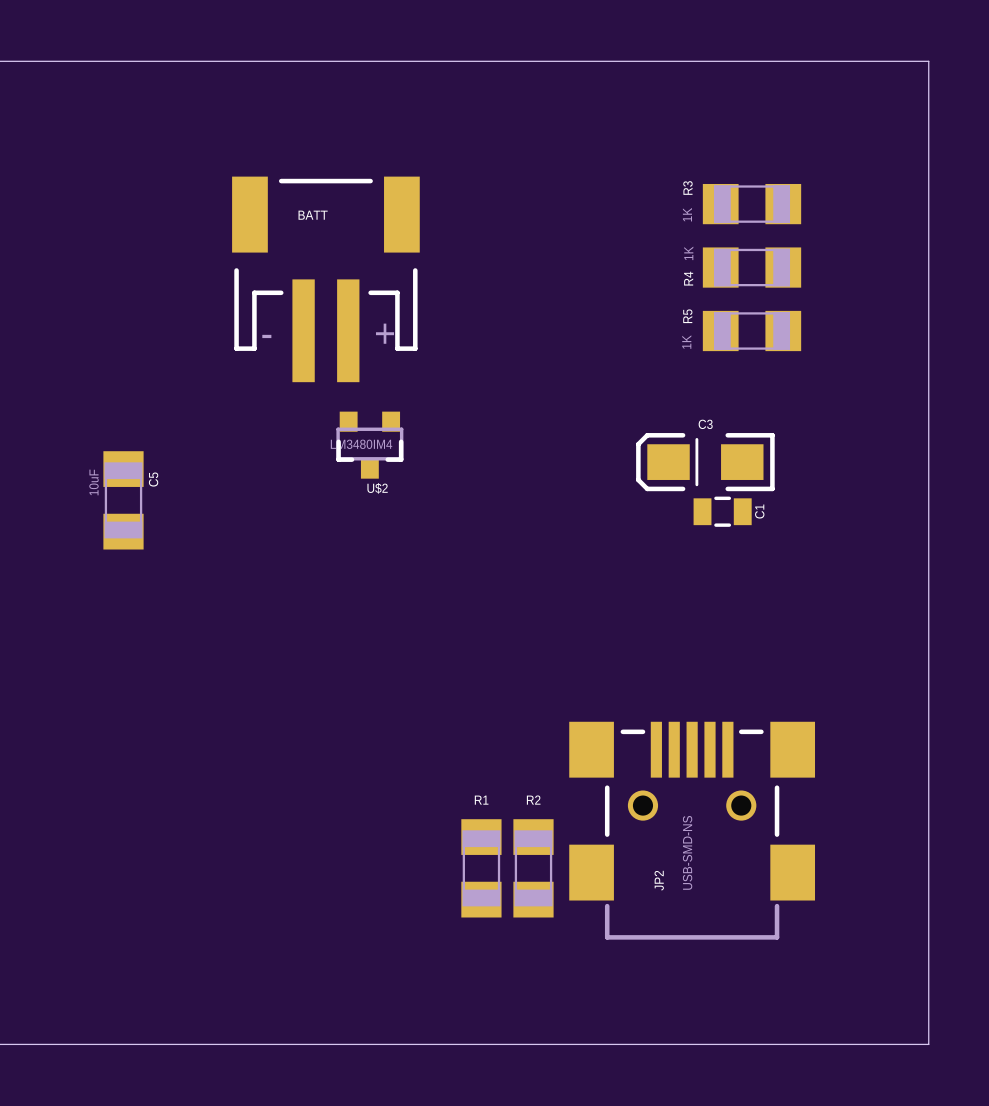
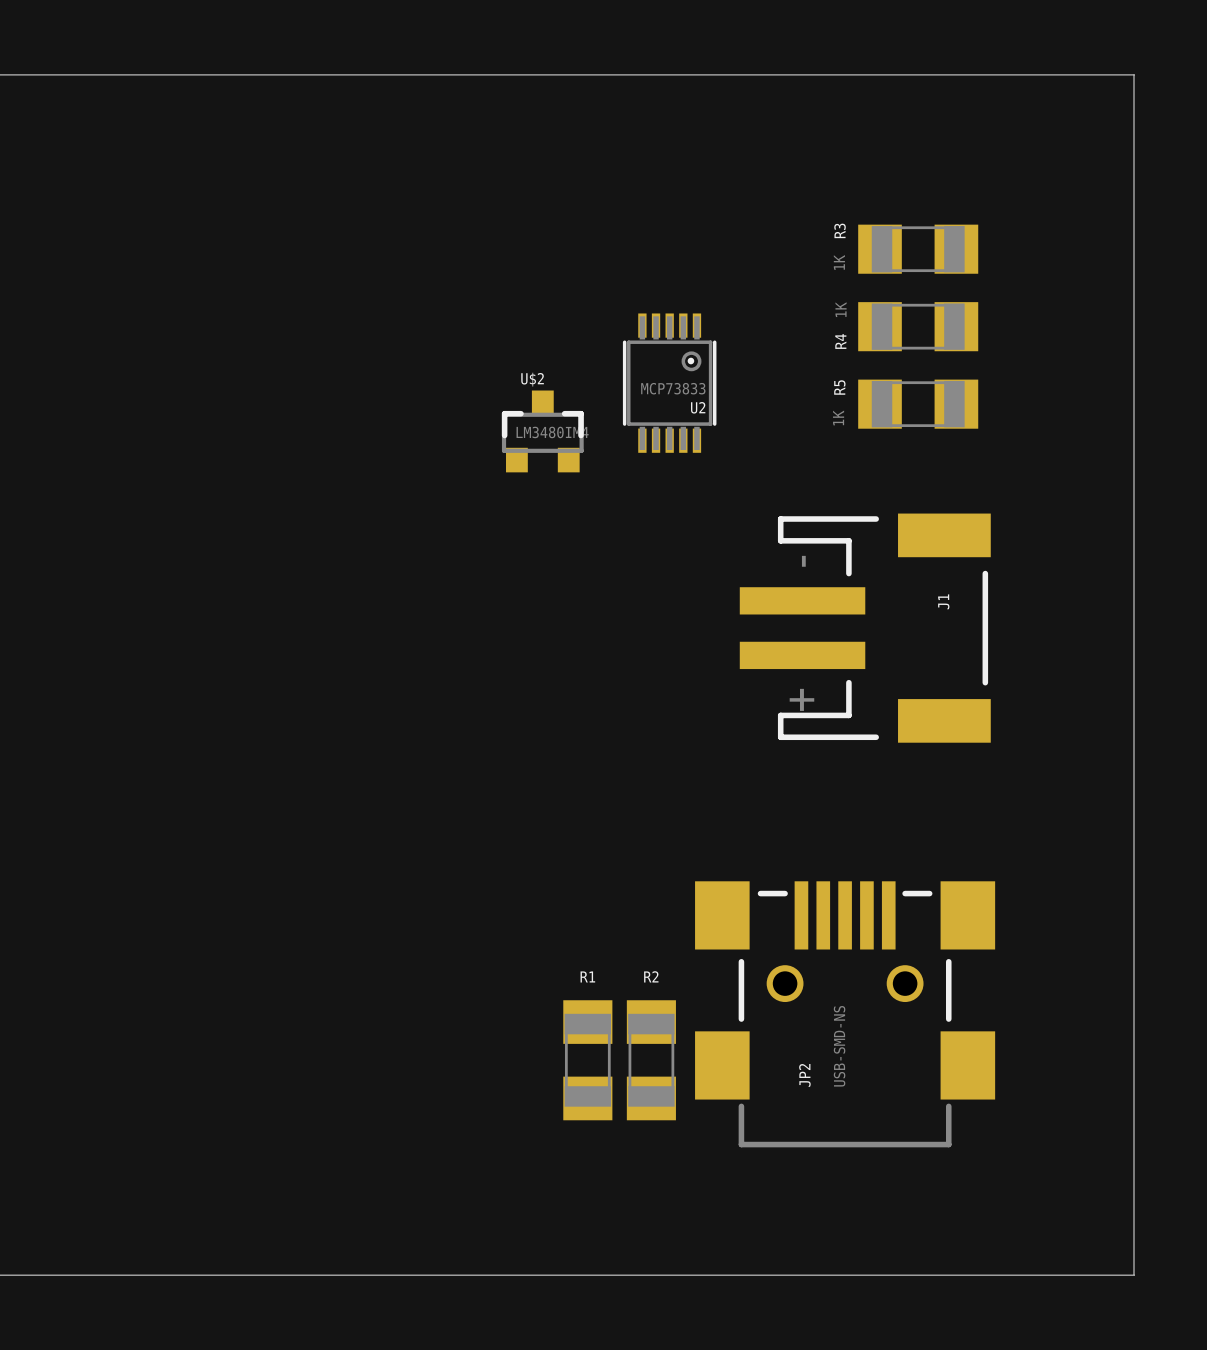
BATT: (325, 279) -> none
U2: none -> MCP73833 (669, 383)
U$2 rotation: 0° (369, 445) -> 180° (542, 431)
U$2 position: (369, 445) -> (542, 431)
C3: (705, 462) -> none
C5: 10uF (123, 500) -> none
C1: (722, 511) -> none
J1: none -> (865, 628)

